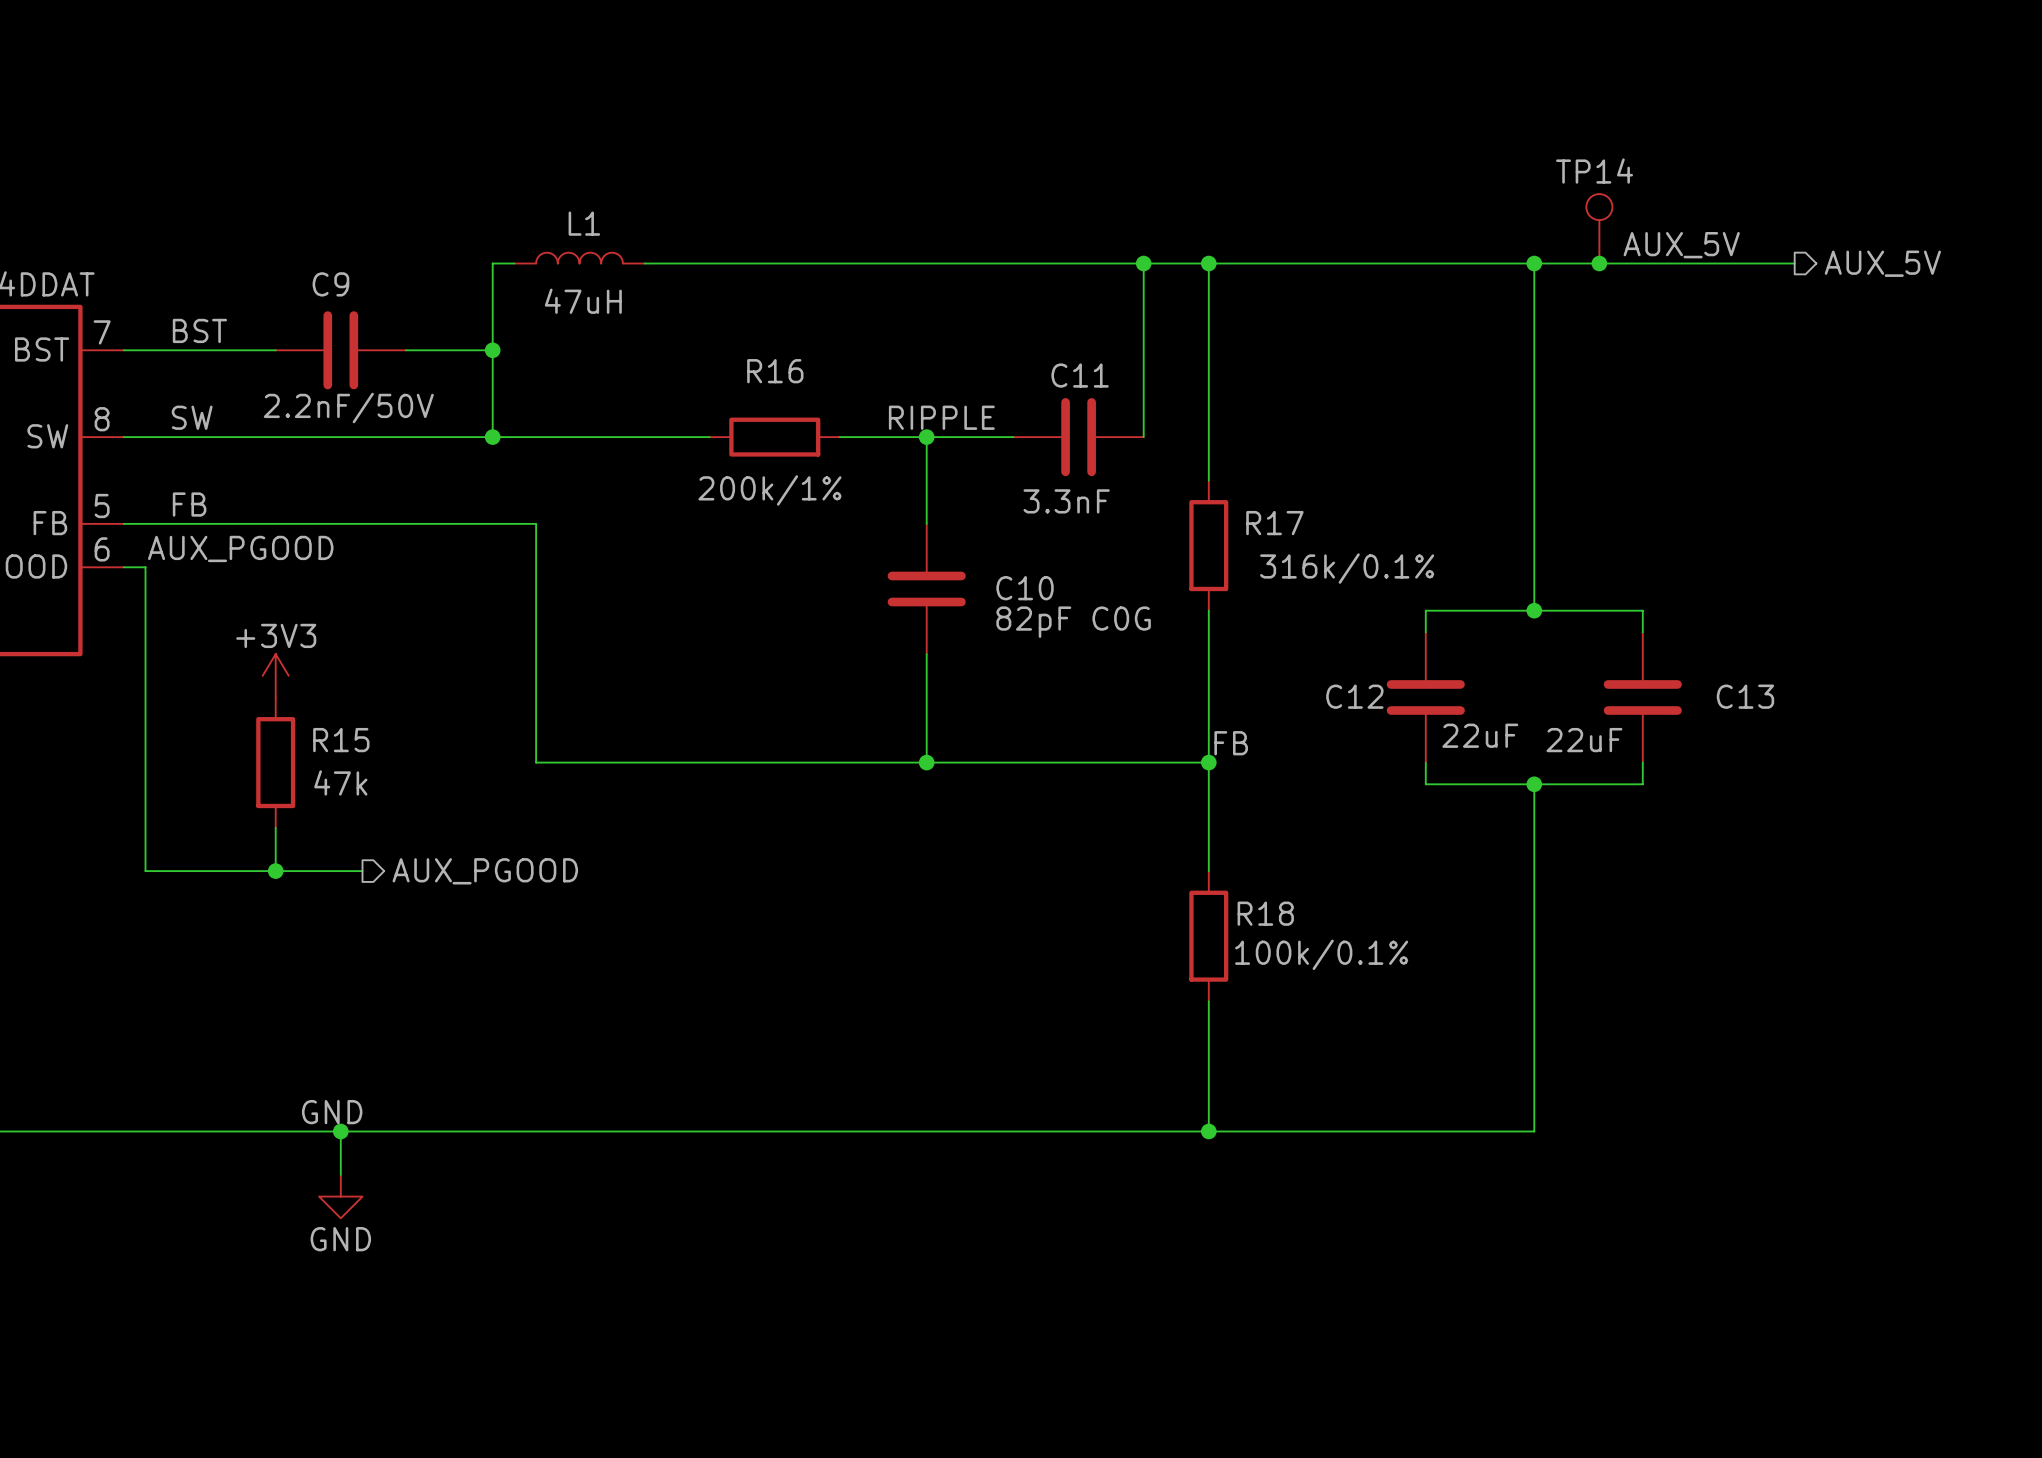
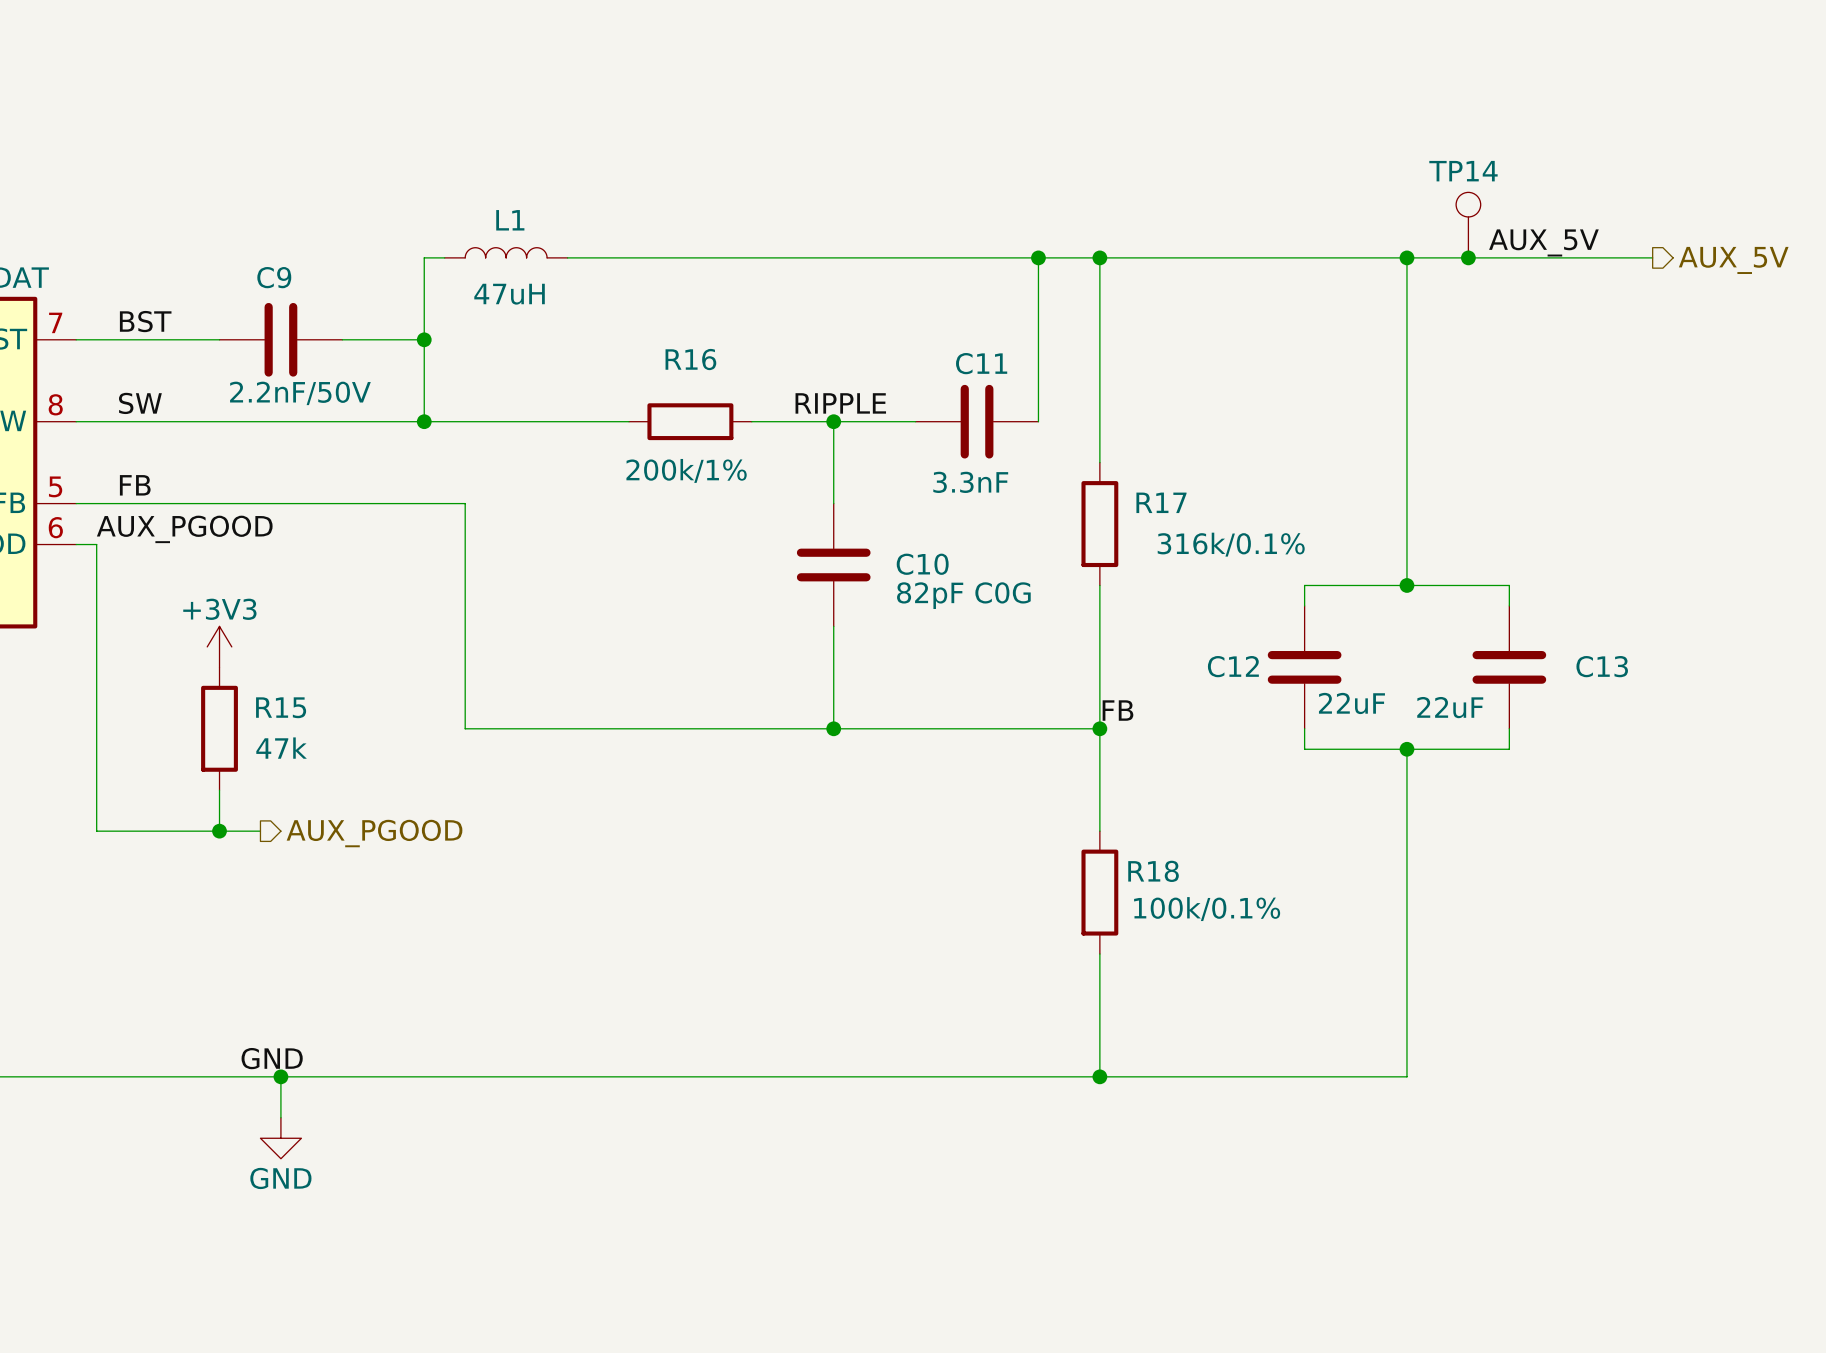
wire: (319, 871) (362, 871) -> none
hierarchical label position: AUX_PGOOD (485, 871) -> AUX_PGOOD (374, 833)

